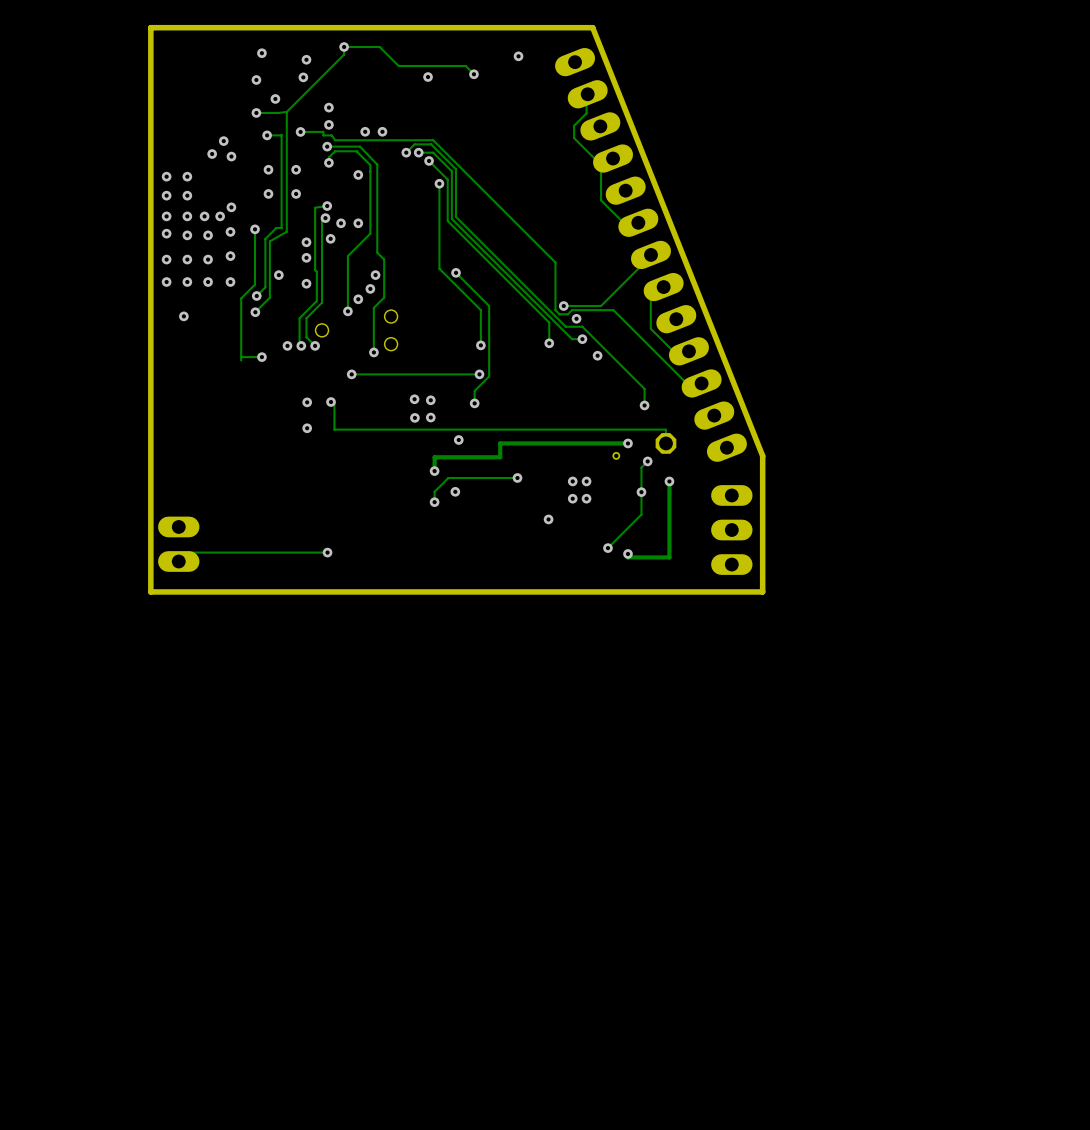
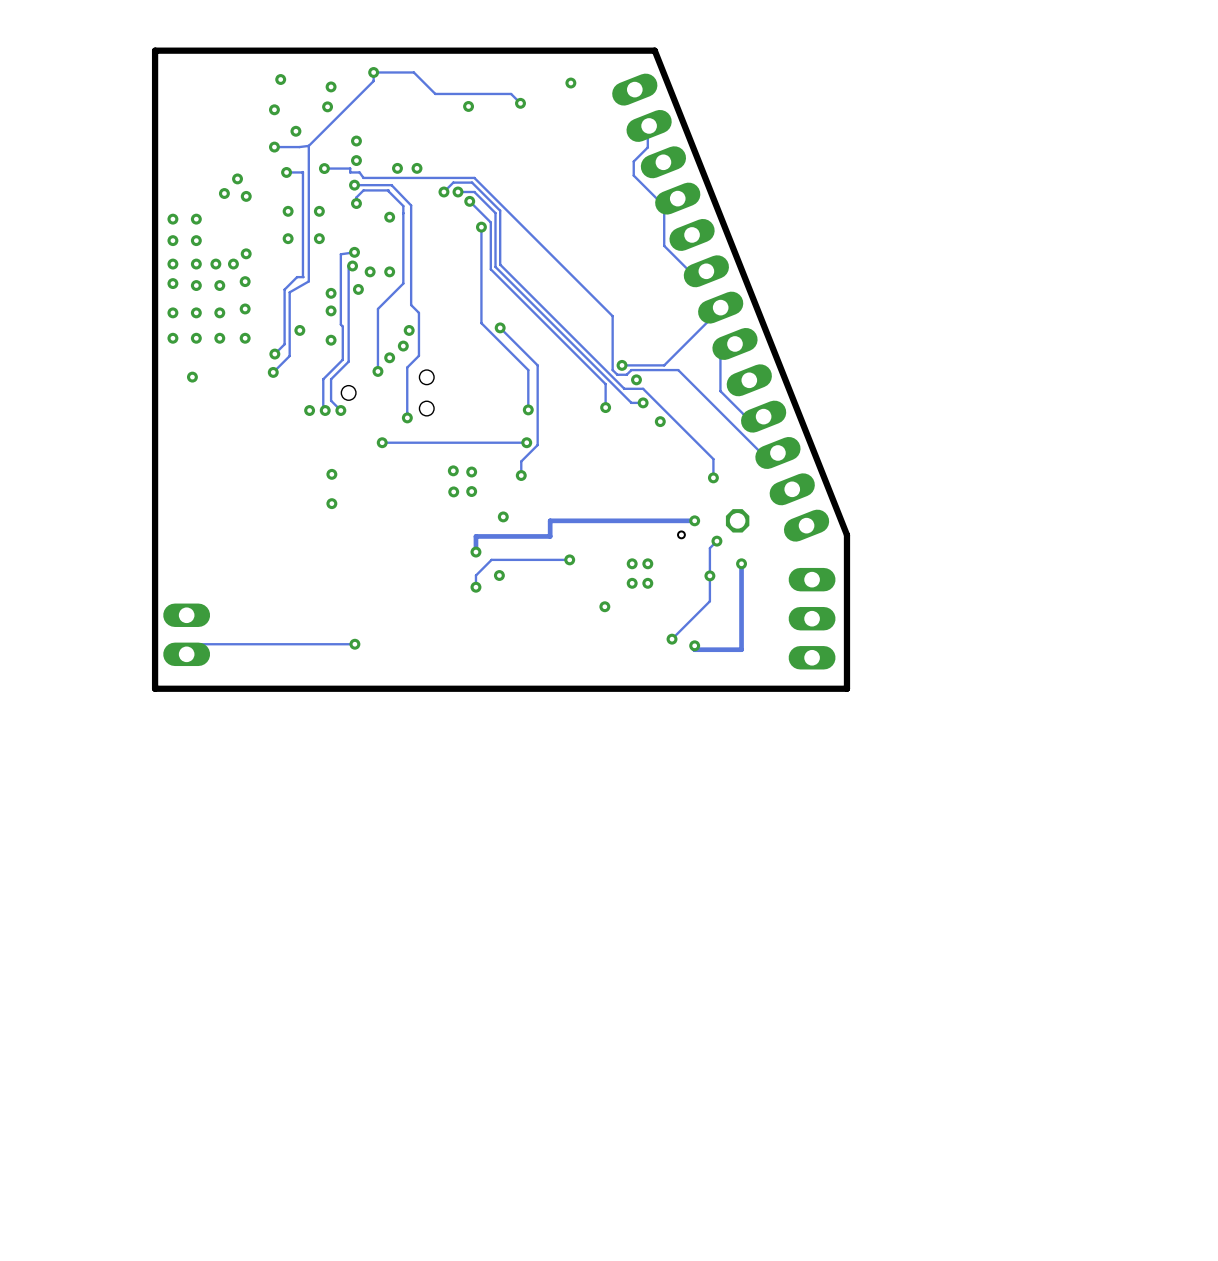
track: (255, 229) (255, 284) (241, 298) (241, 360) -> none
via: (255, 229) -> none
track: (261, 357) (241, 357) -> none
via: (261, 357) -> none
track: (330, 402) (334, 402) (334, 429) (665, 429) (665, 443) -> none
via: (330, 402) -> none

